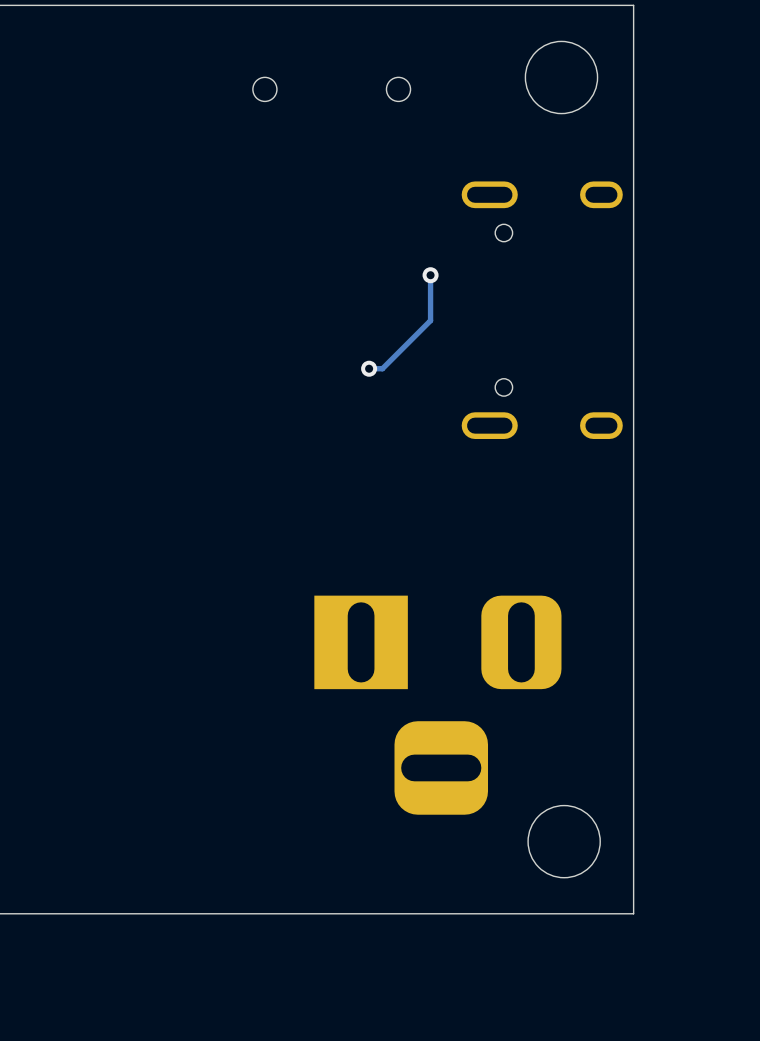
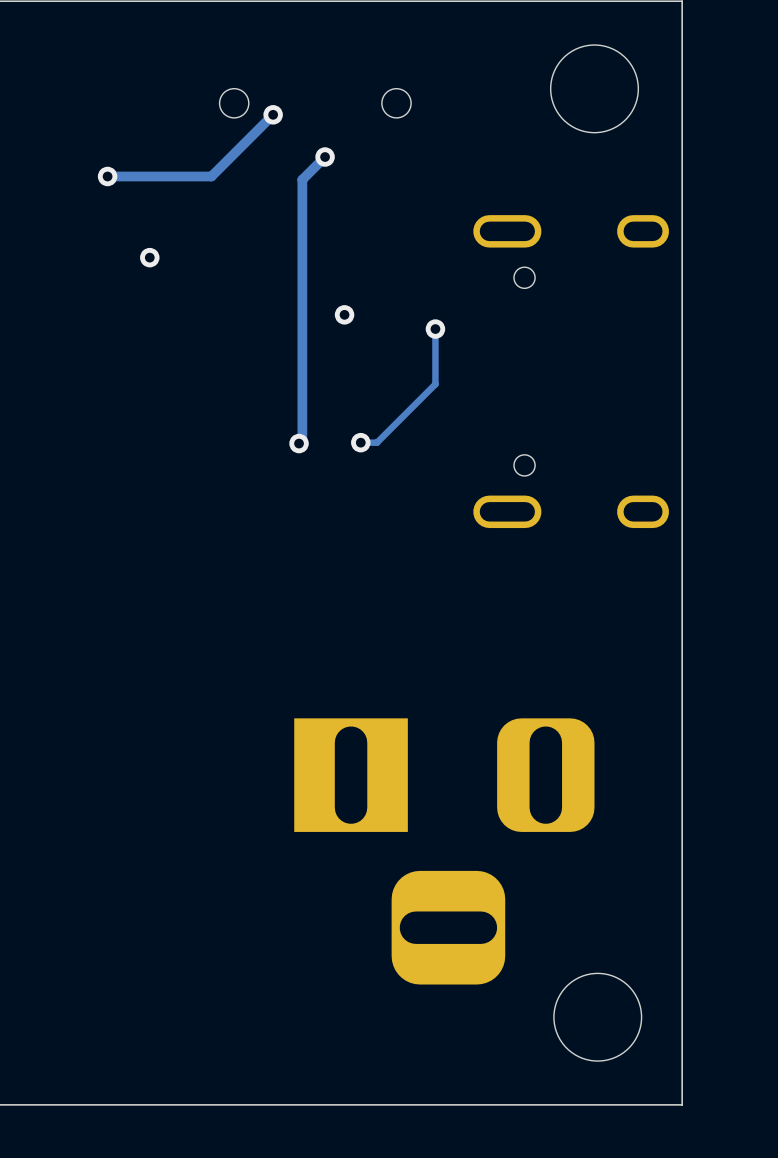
track: none -> (273, 114) (211, 176) (107, 176)
via: none -> (273, 114)
track: none -> (325, 157) (302, 179) (302, 440) (299, 443)
via: none -> (325, 157)
via: none -> (107, 176)
via: none -> (149, 257)
via: none -> (344, 314)
via: none -> (299, 443)

